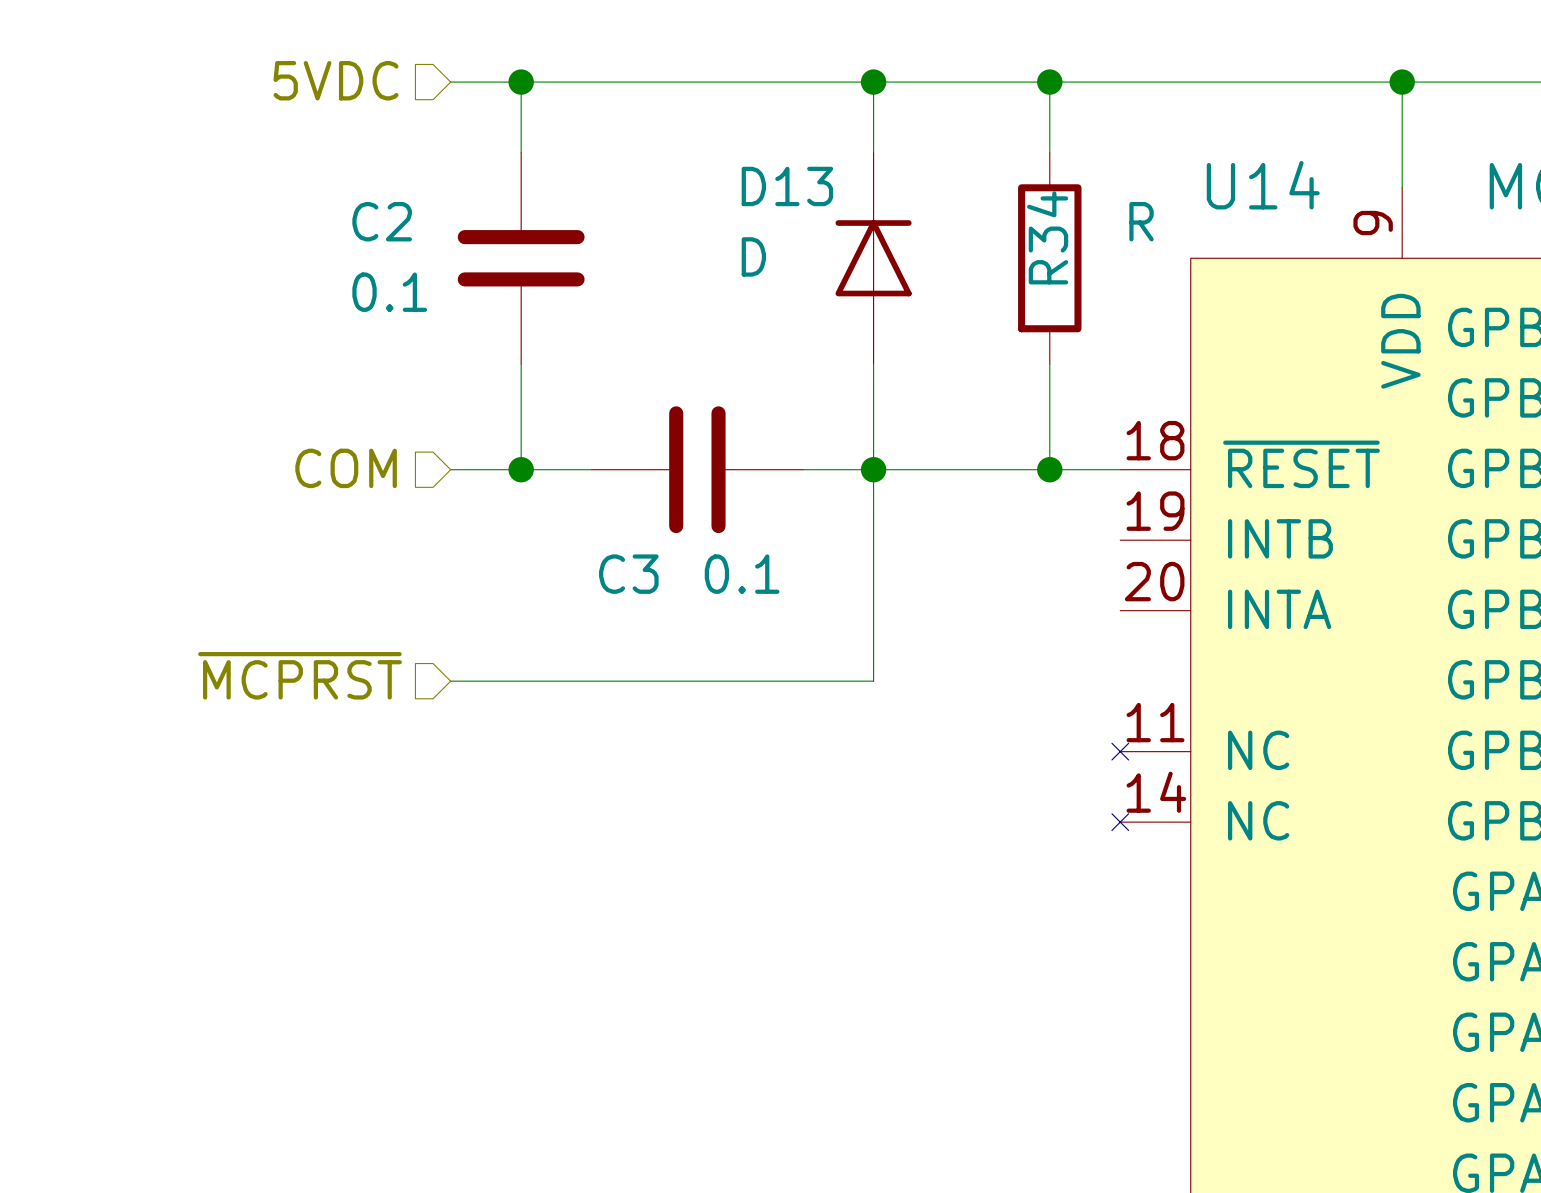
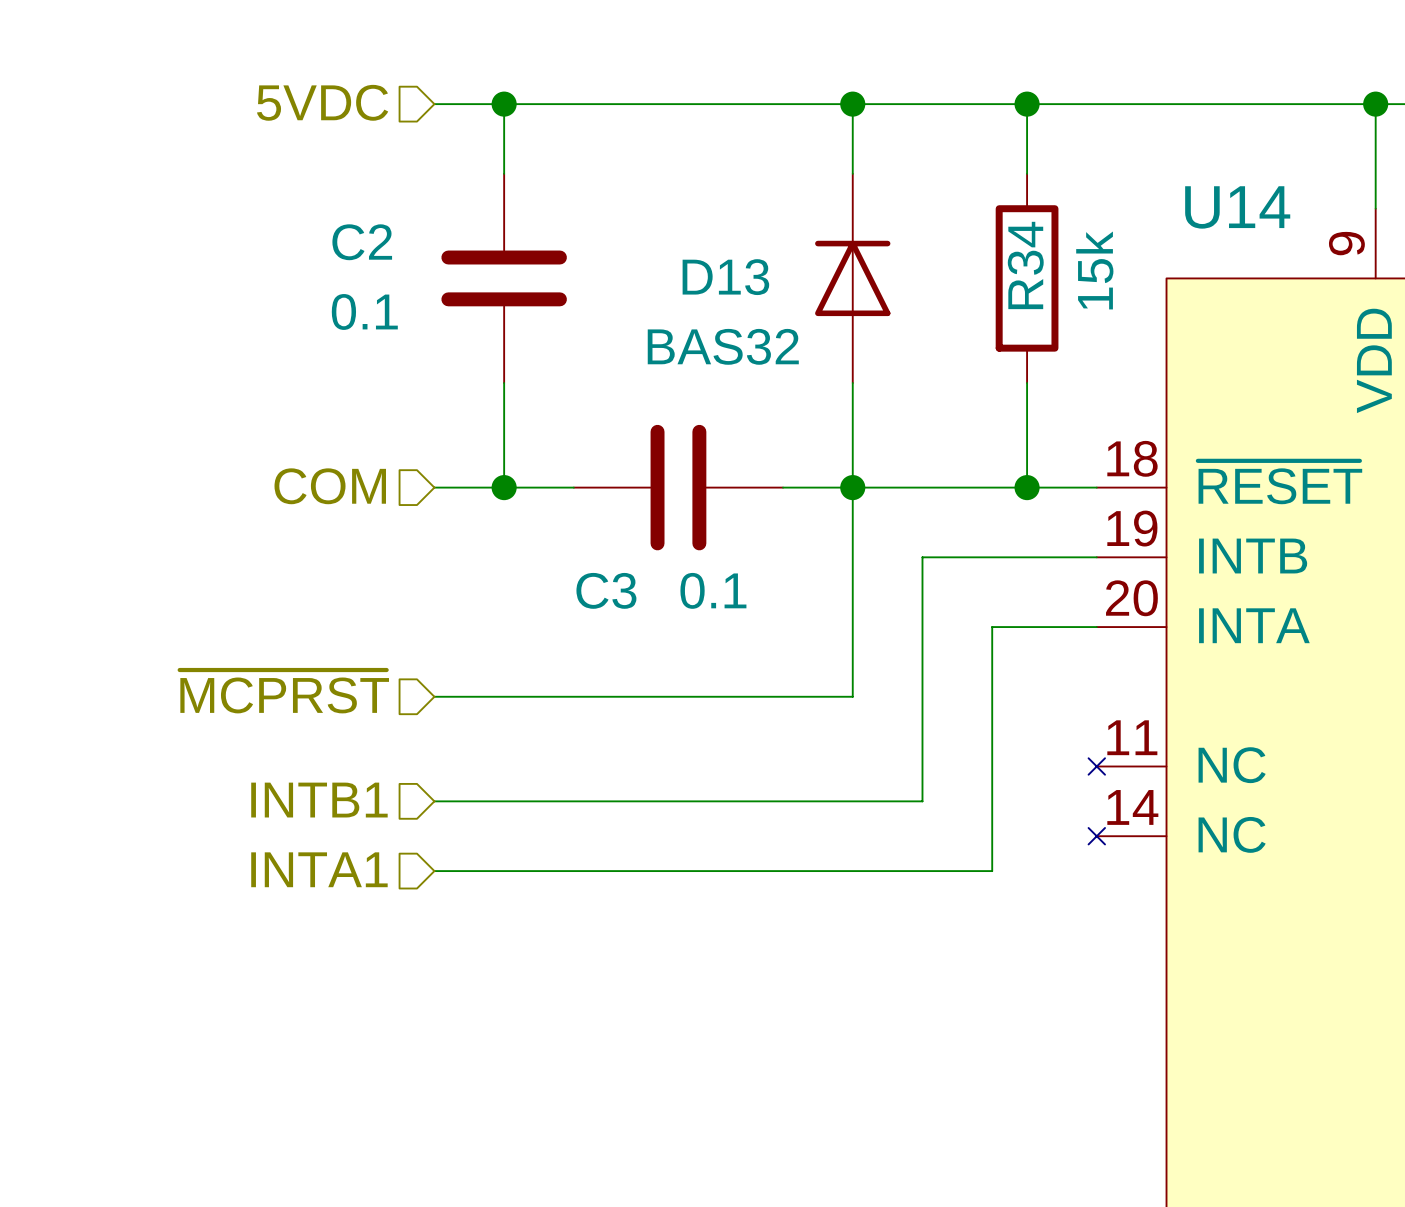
D13 name position: D13 (787, 186) -> D13 (725, 277)
R34 value: R (1141, 221) -> 15k (1094, 270)
D13 value: D (753, 256) -> BAS32 (723, 346)
wire: none -> (1096, 557) (922, 557) (922, 801) (434, 801)
wire: none -> (1096, 627) (992, 627) (992, 871) (434, 871)
hierarchical label: none -> INTB1 (319, 800)
hierarchical label: none -> INTA1 (319, 869)

